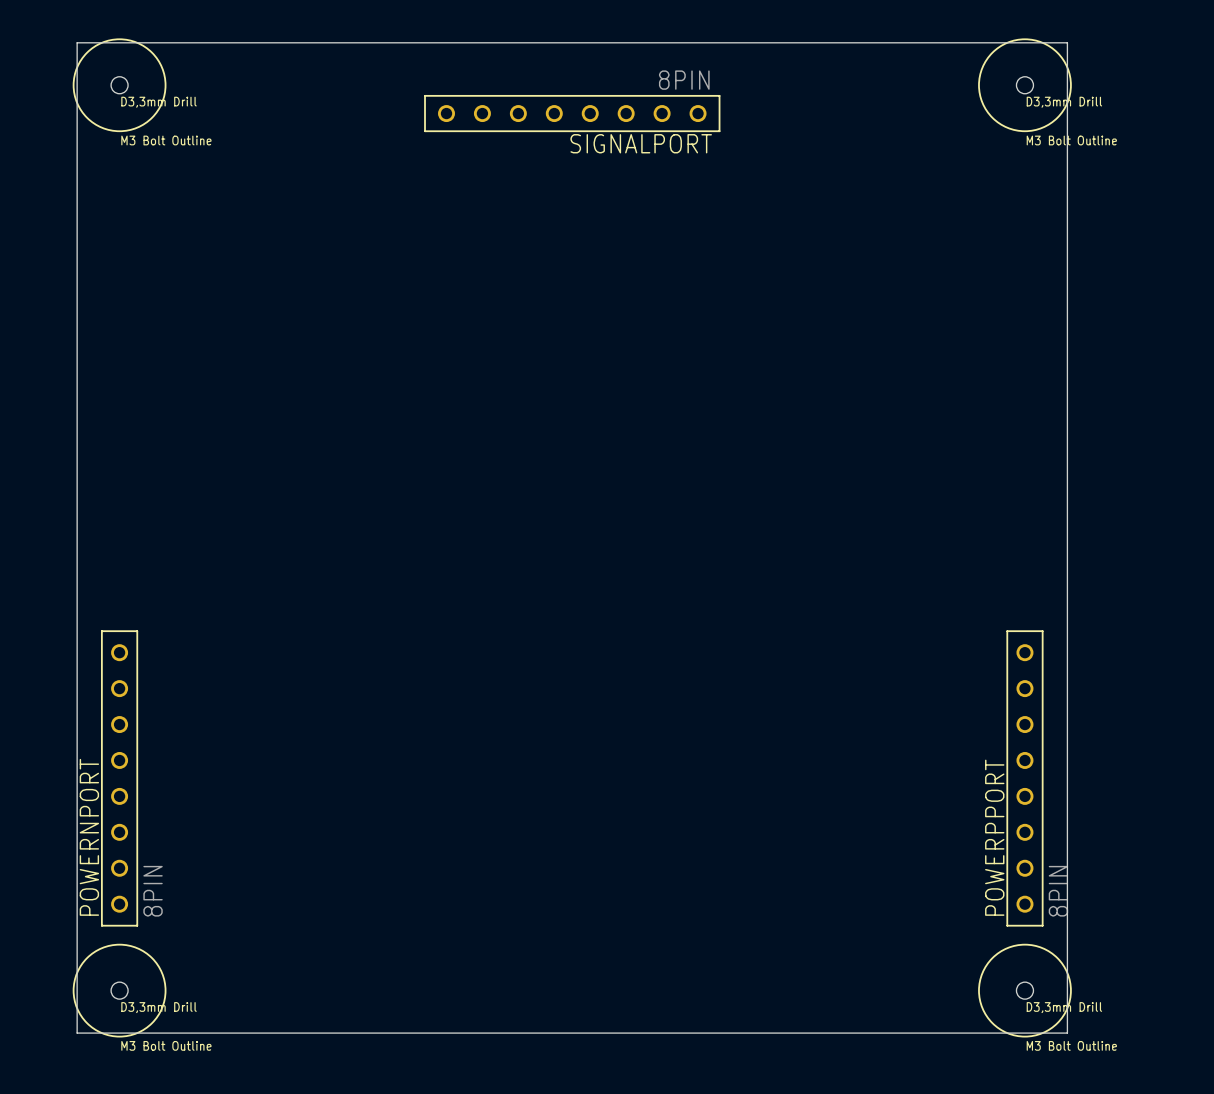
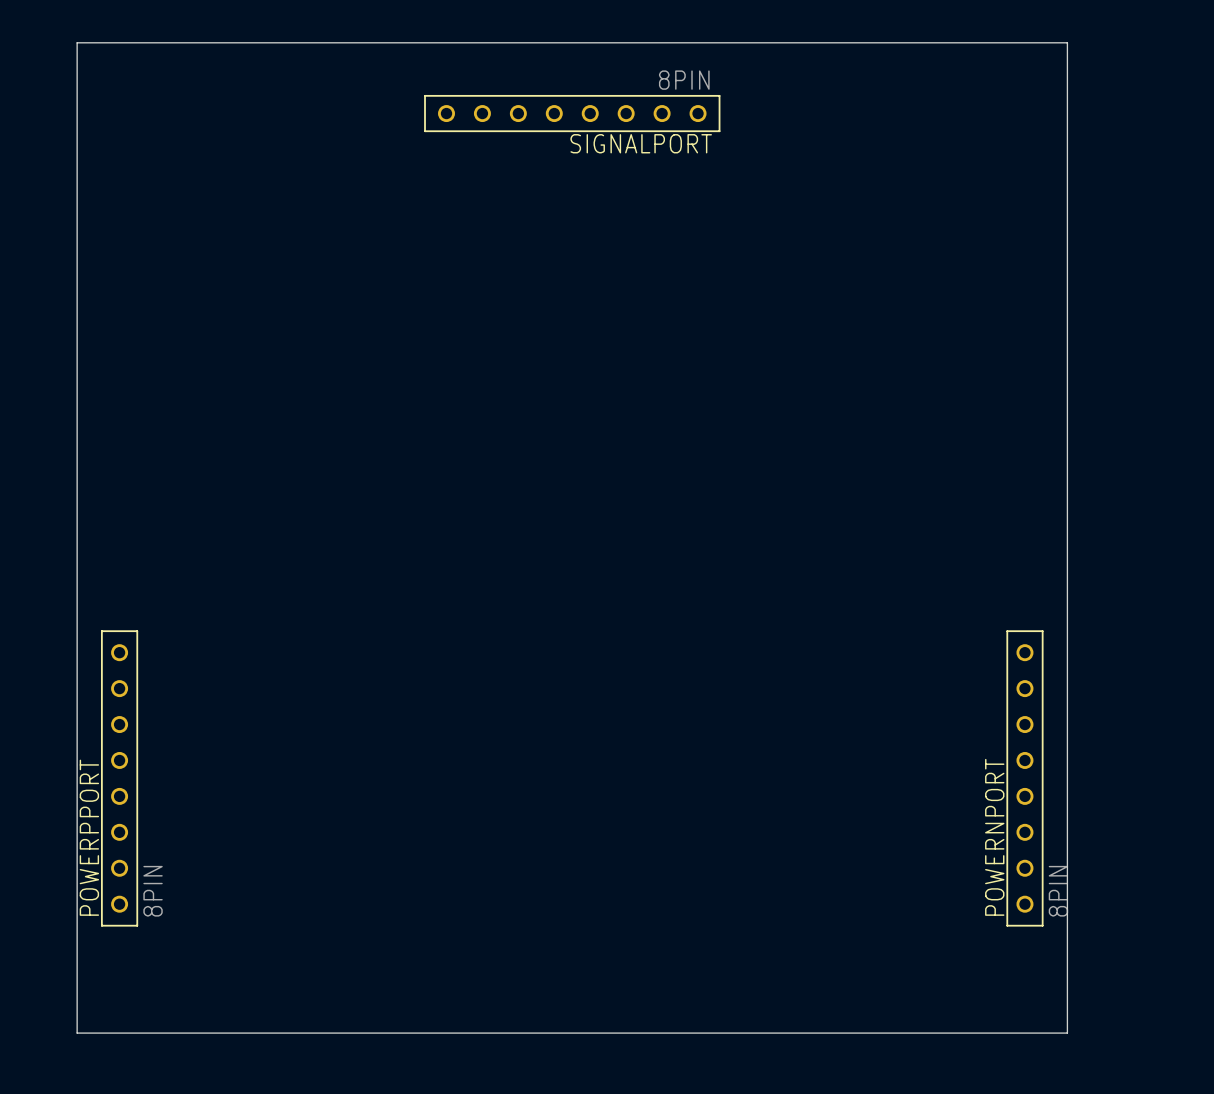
part: (119, 85) -> none
part: (1024, 85) -> none
POWERNPORT name: POWERNPORT (89, 837) -> POWERPPORT (89, 837)
POWERPPORT name: POWERPPORT (994, 837) -> POWERNPORT (994, 837)
part: (119, 990) -> none
part: (1024, 990) -> none

